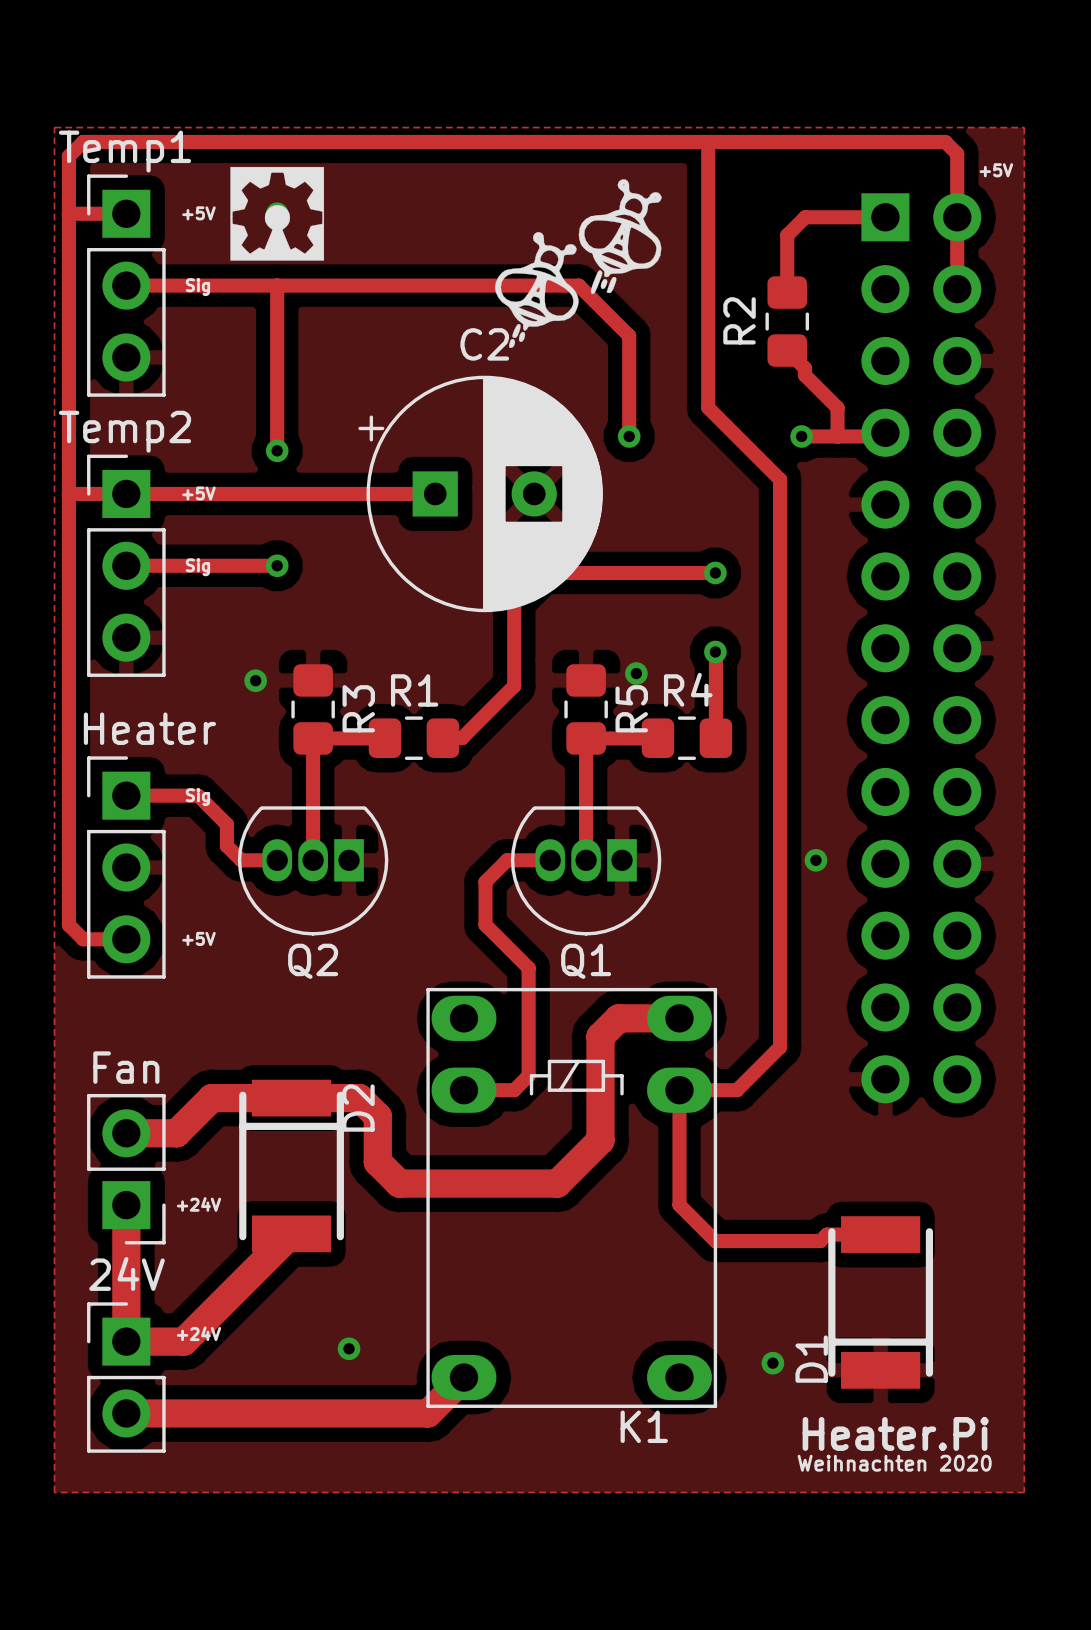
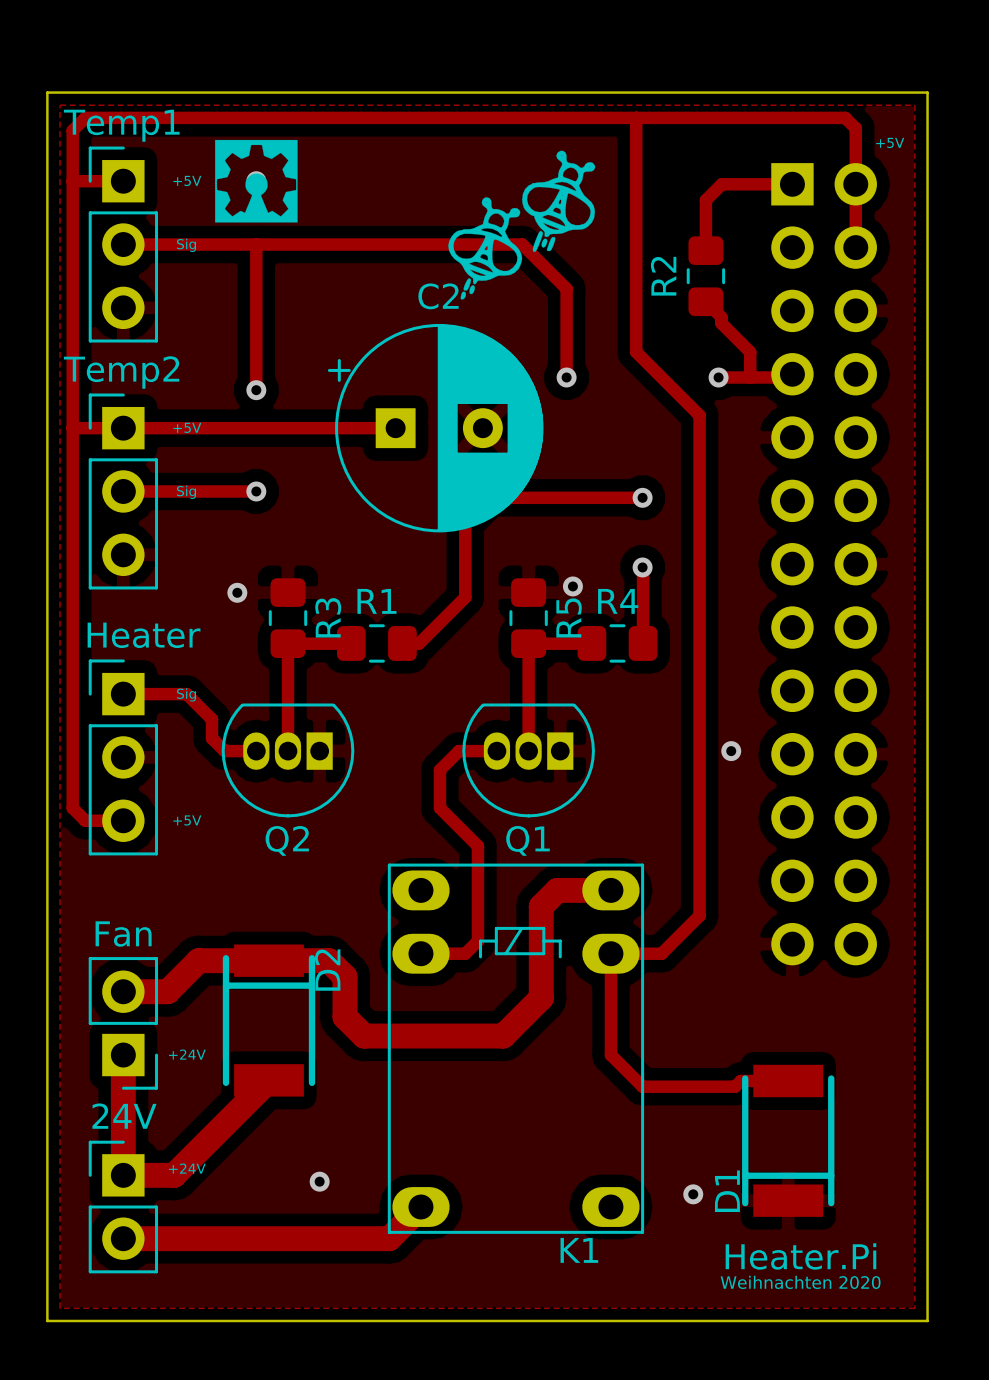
board edge: none -> (47, 92) (47, 1320) (927, 1320) (927, 92) (47, 92)

